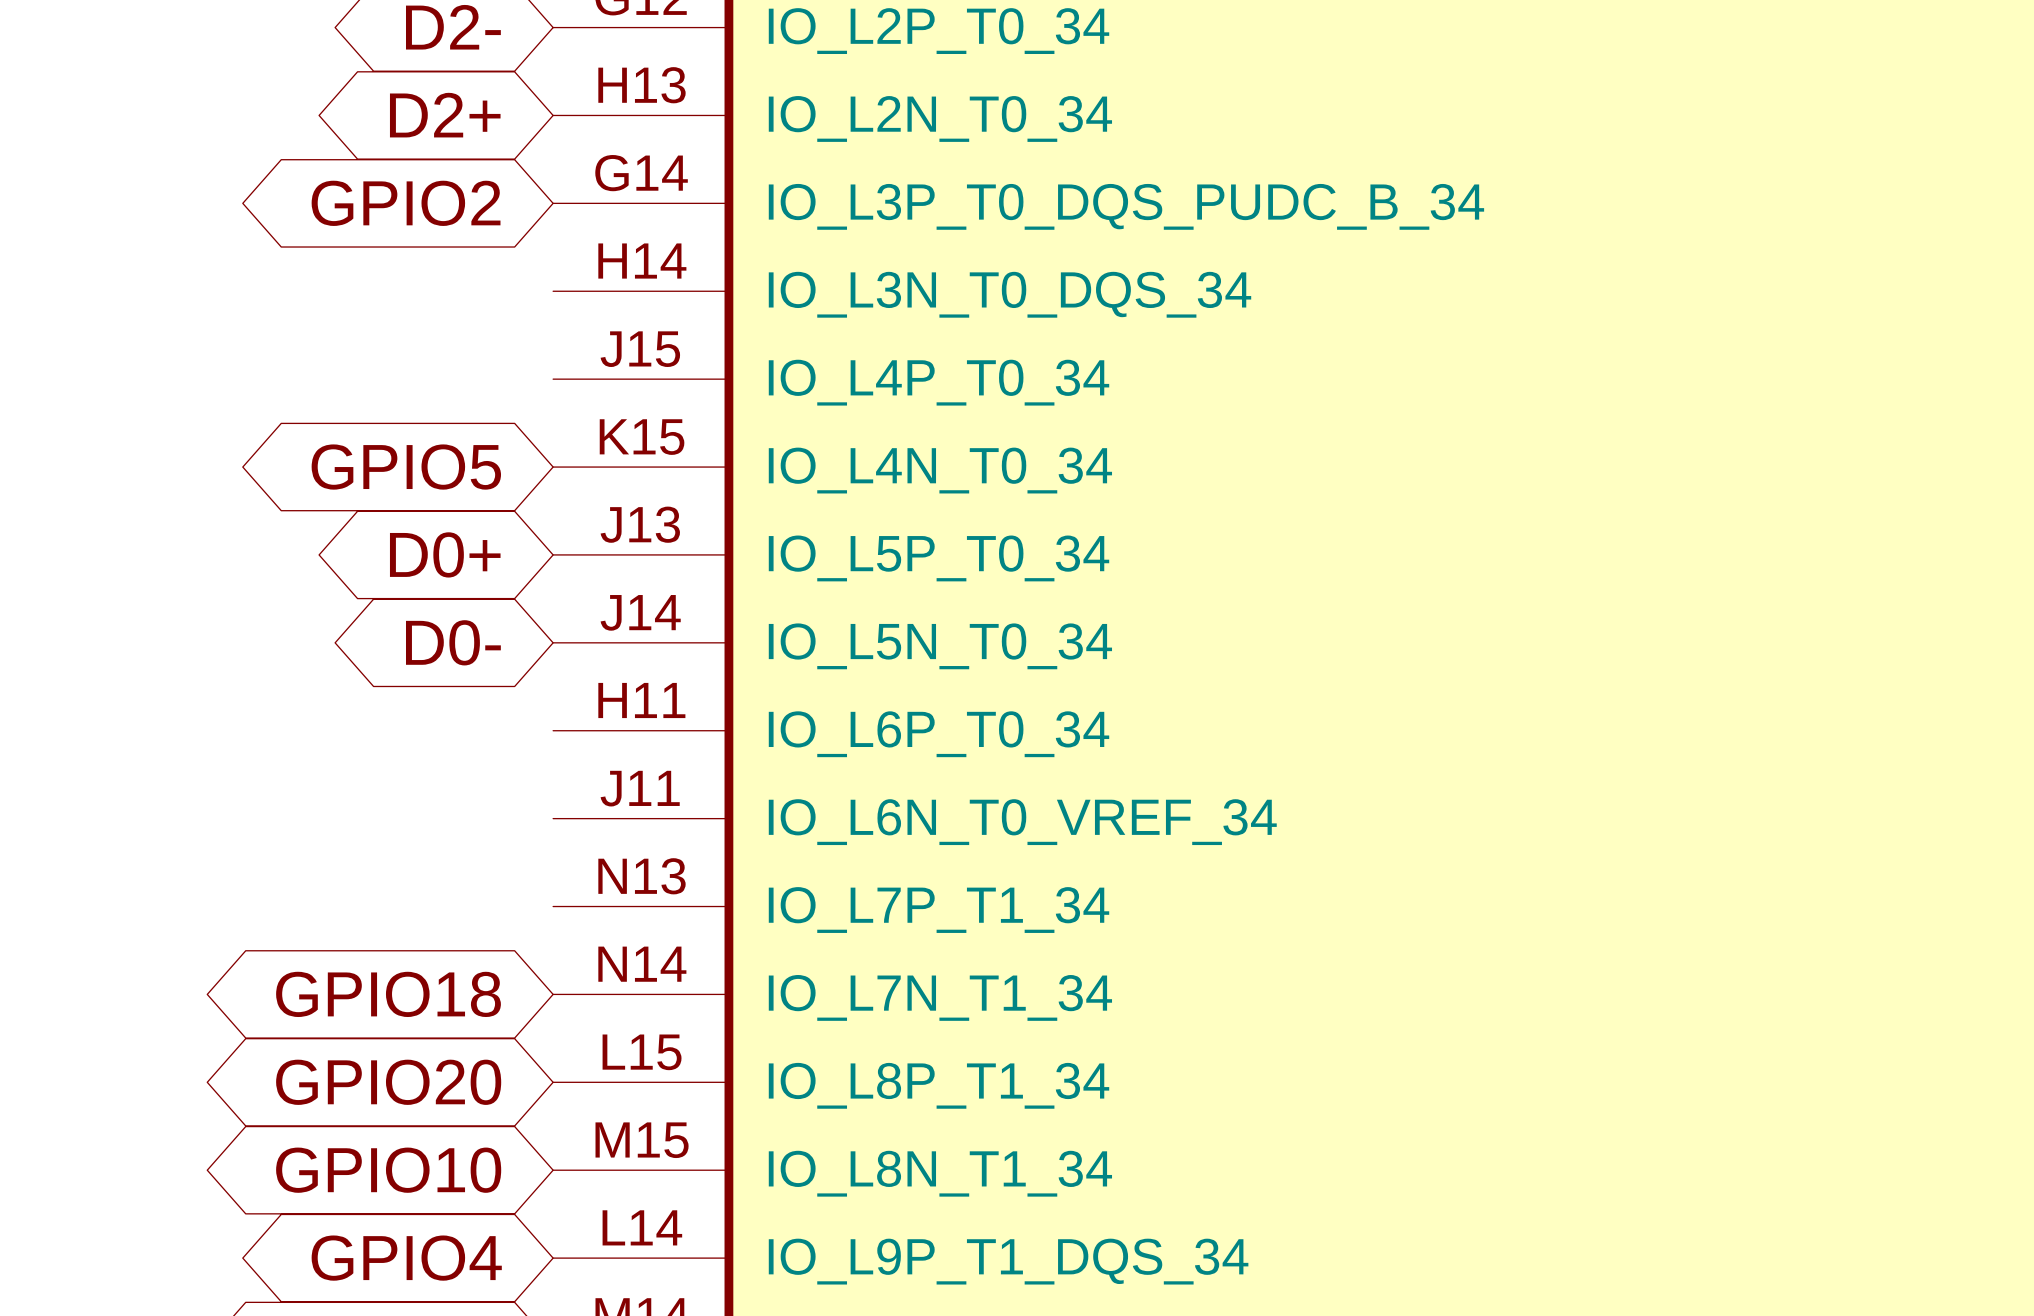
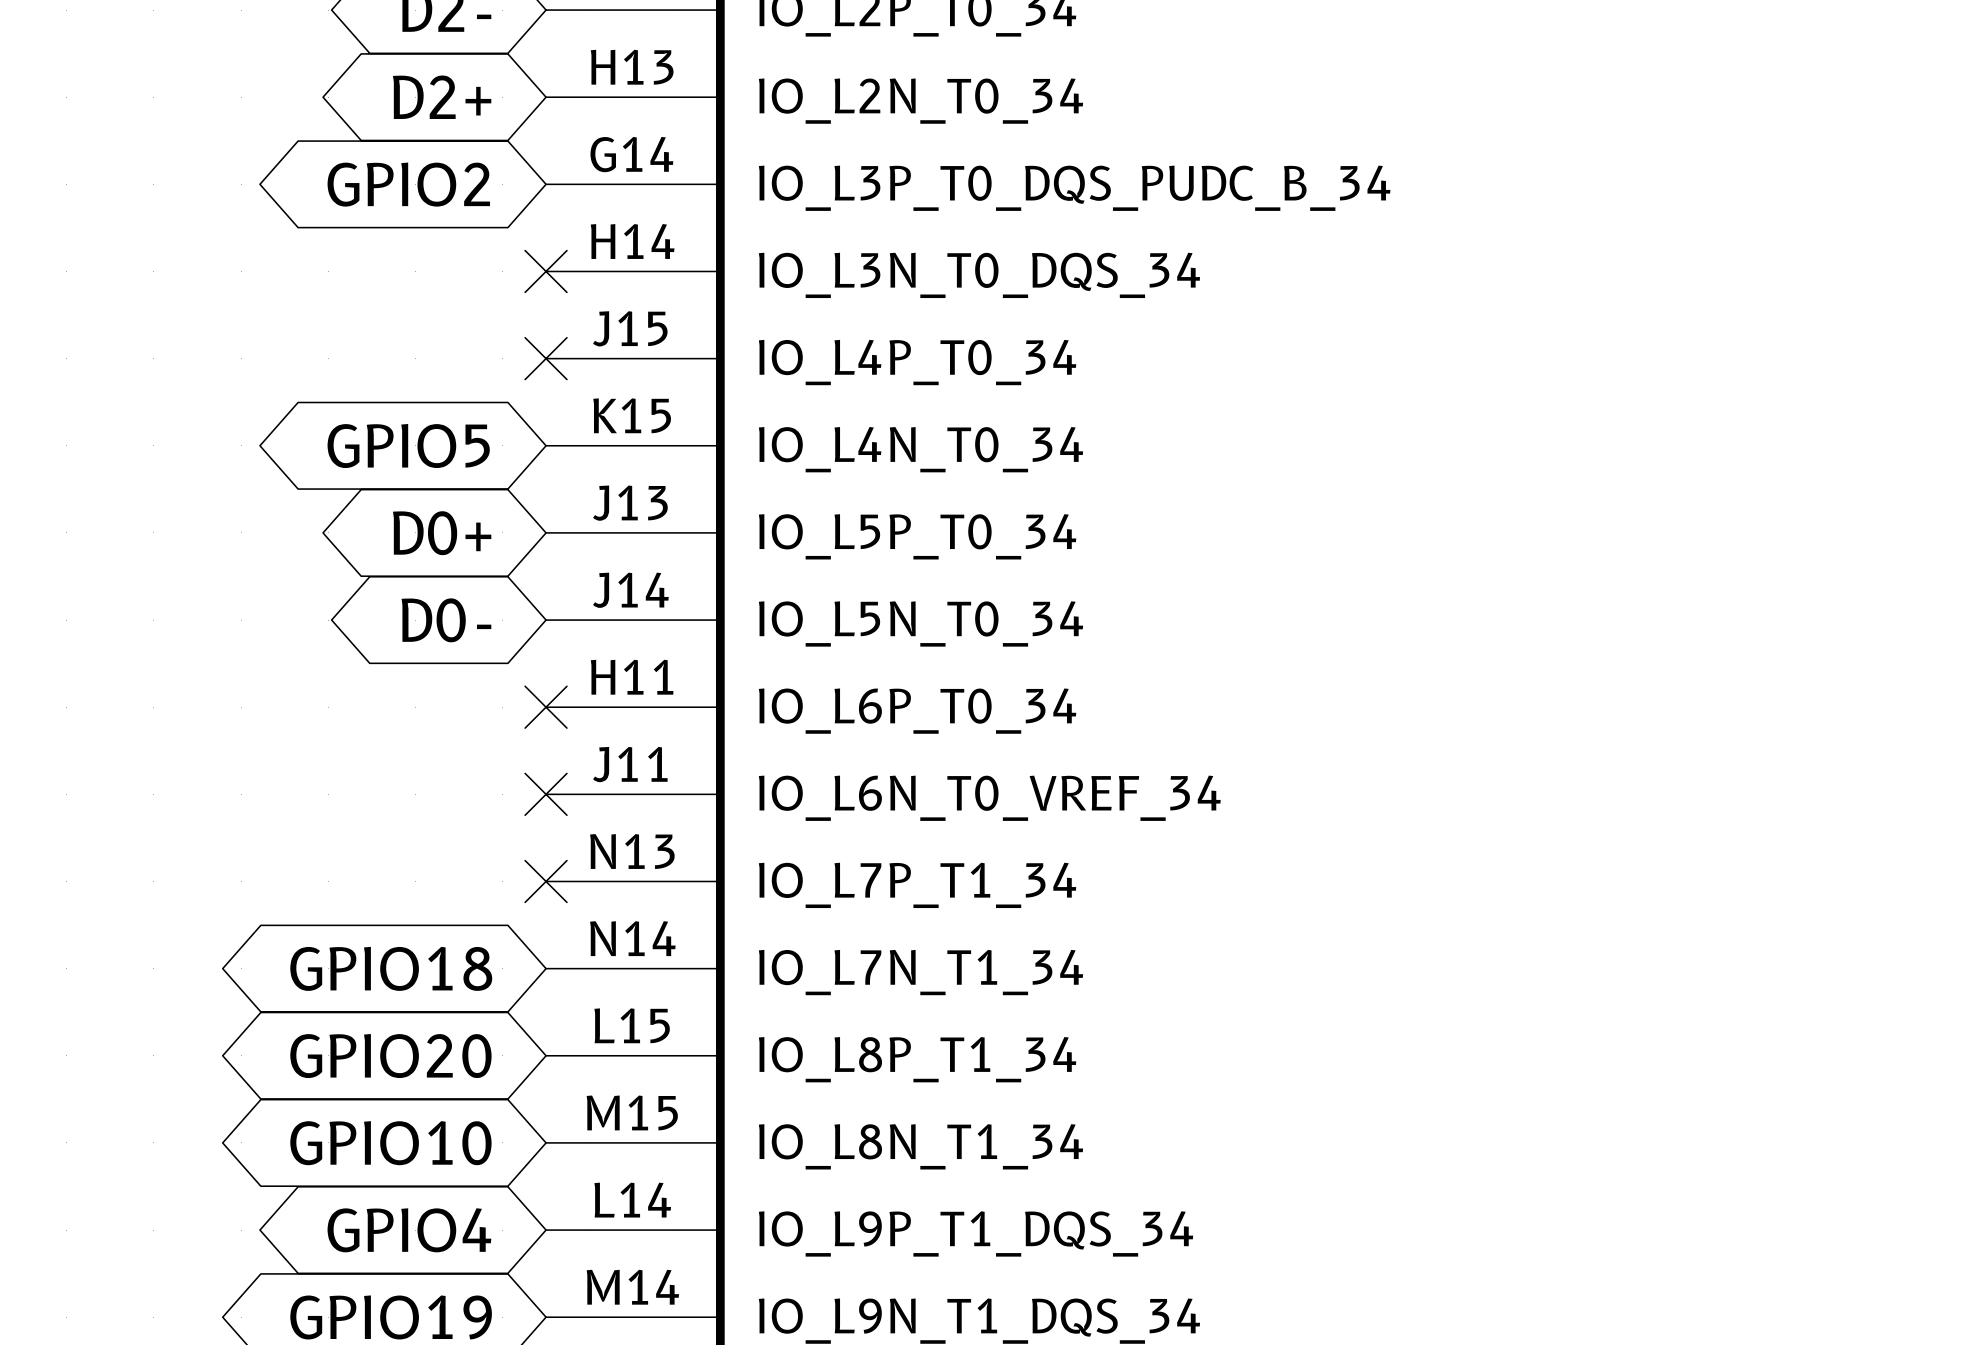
no-connect mark: none -> (546, 271)
no-connect mark: none -> (546, 358)
no-connect mark: none -> (546, 707)
no-connect mark: none -> (546, 794)
no-connect mark: none -> (546, 881)

